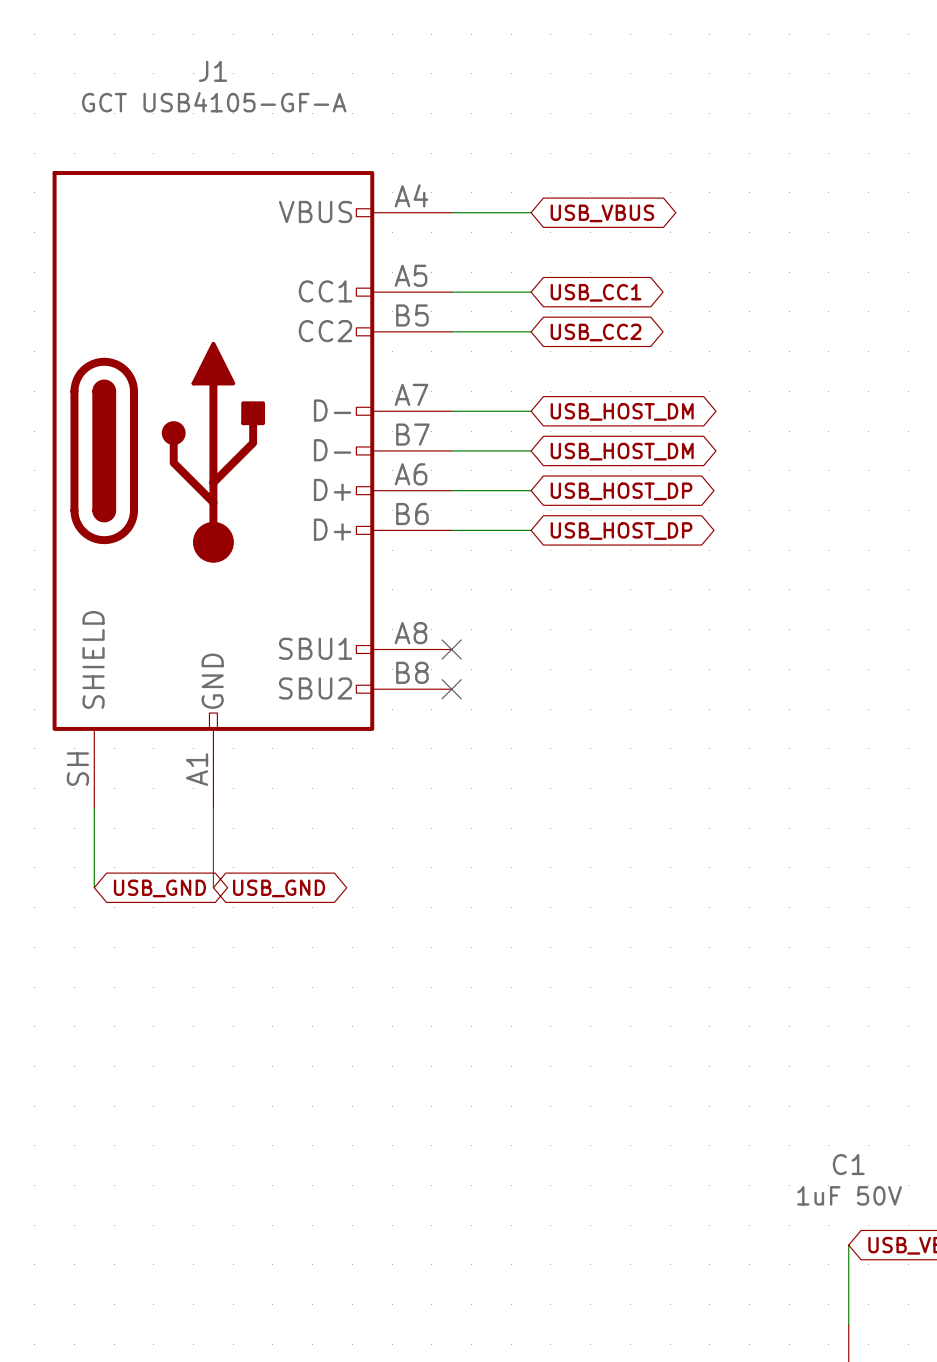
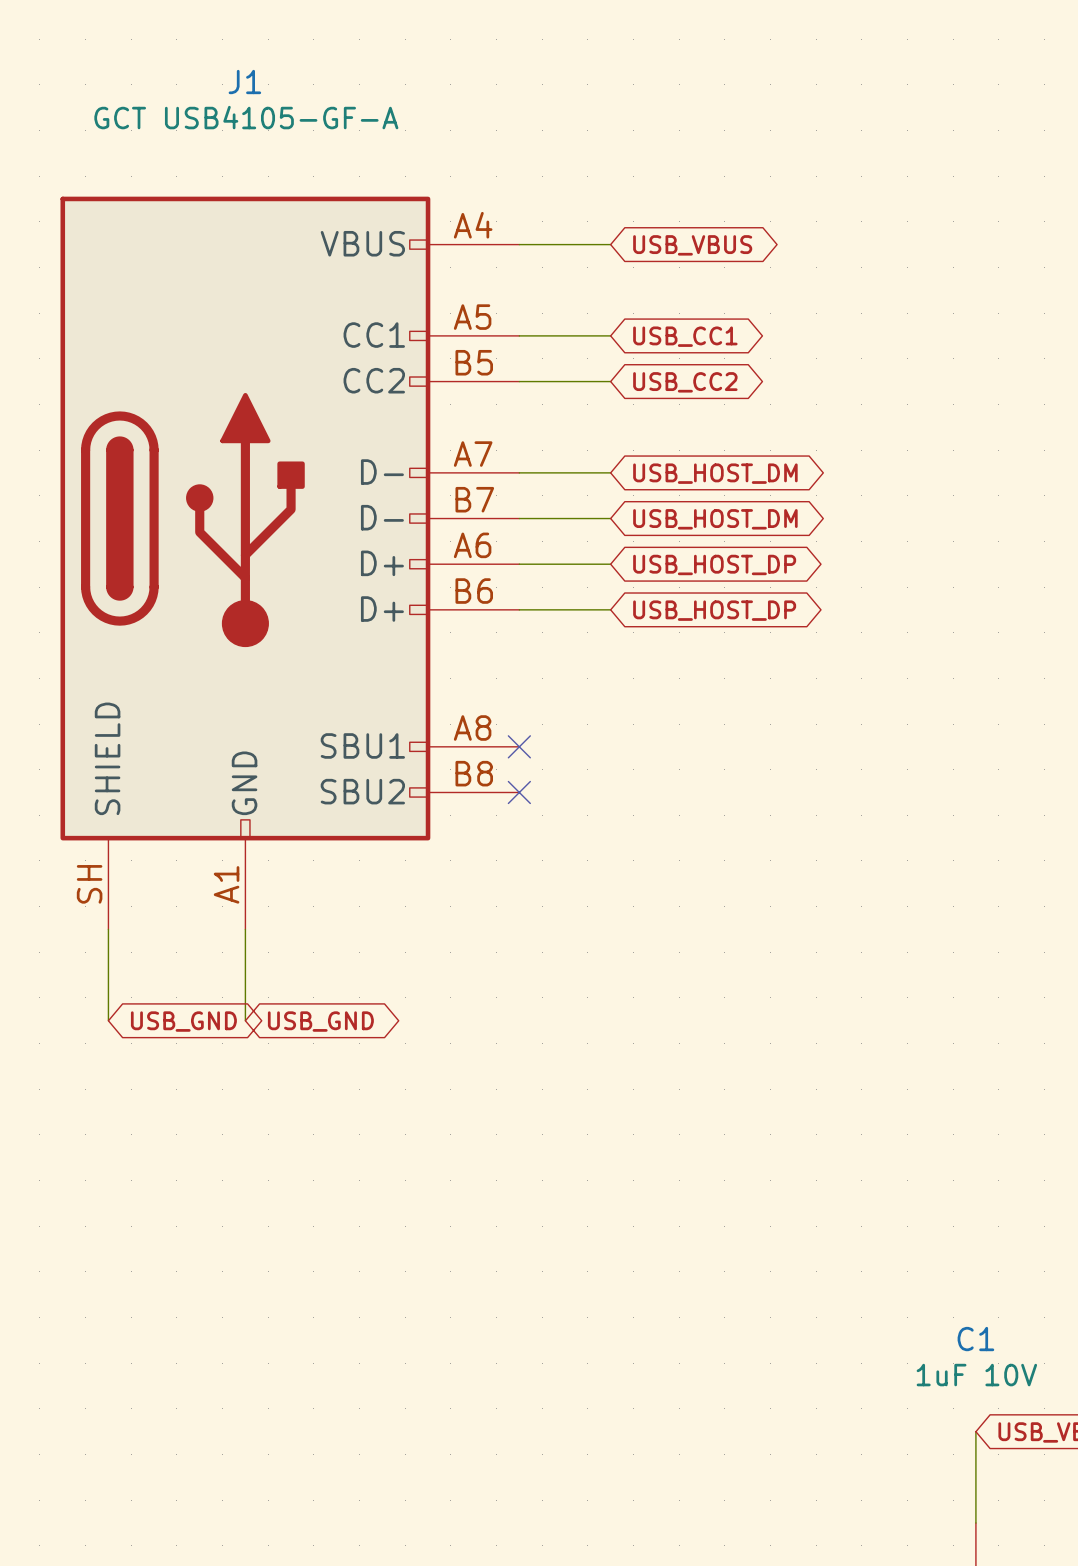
C1 value: 1uF 50V (849, 1195) -> 1uF 10V (976, 1375)

